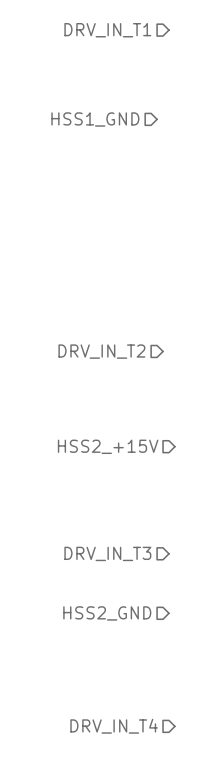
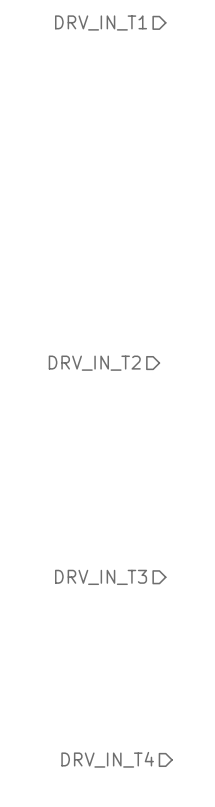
hierarchical label: HSS1_GND (95, 119) -> none
hierarchical label: HSS2_+15V (108, 446) -> none
hierarchical label: HSS2_GND (107, 613) -> none

